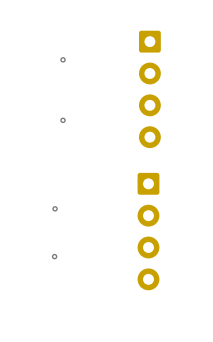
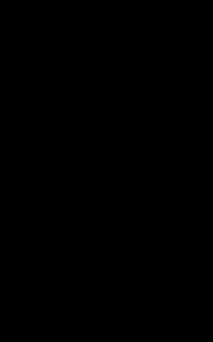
via: (63, 59) -> none
part: (149, 89) -> none
via: (63, 120) -> none
via: (55, 208) -> none
part: (148, 231) -> none
via: (54, 256) -> none

